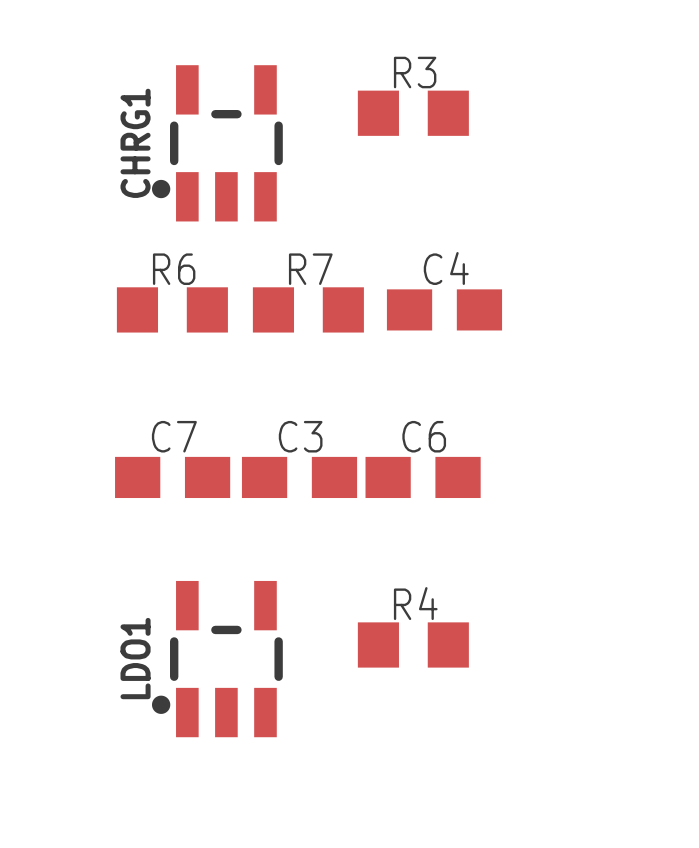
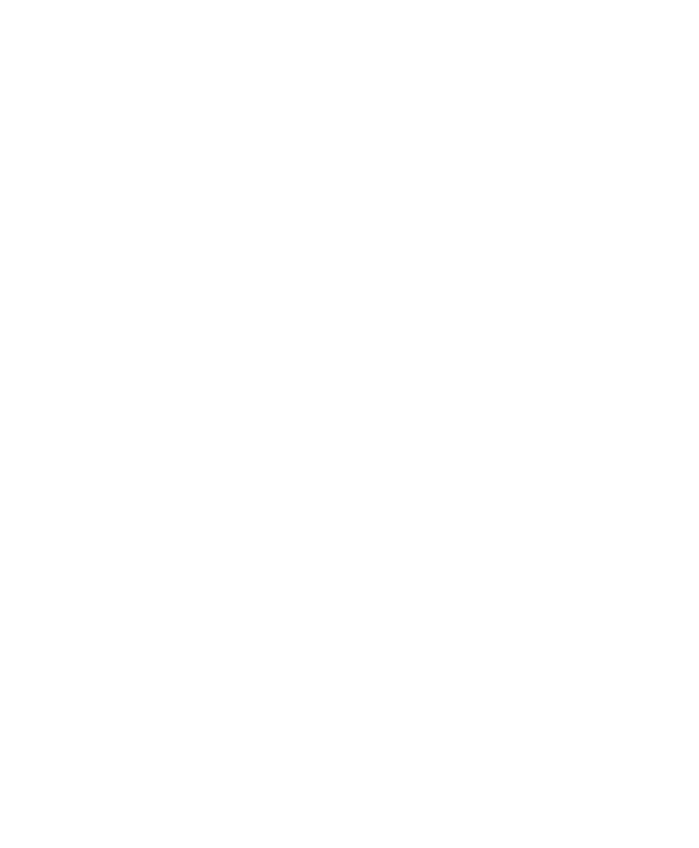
R3: (413, 113) -> none
CHRG1: (217, 143) -> none
R6: (172, 309) -> none
R7: (308, 309) -> none
C4: (444, 309) -> none
C7: (172, 477) -> none
C3: (299, 477) -> none
C6: (423, 477) -> none
R4: (413, 644) -> none
LDO1: (217, 659) -> none

